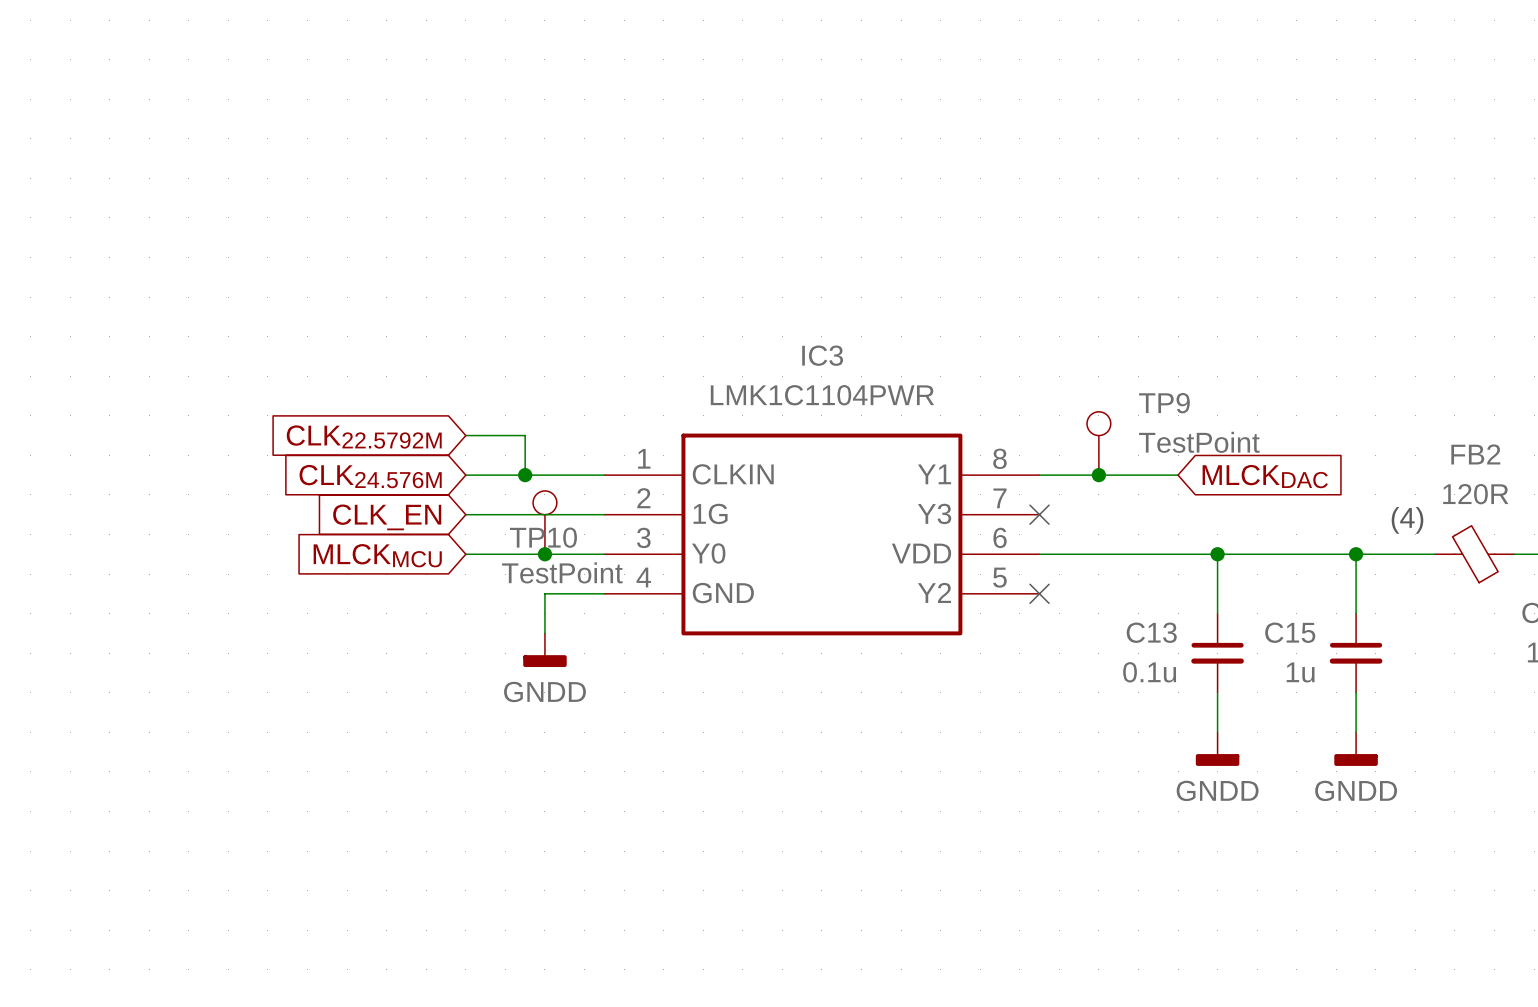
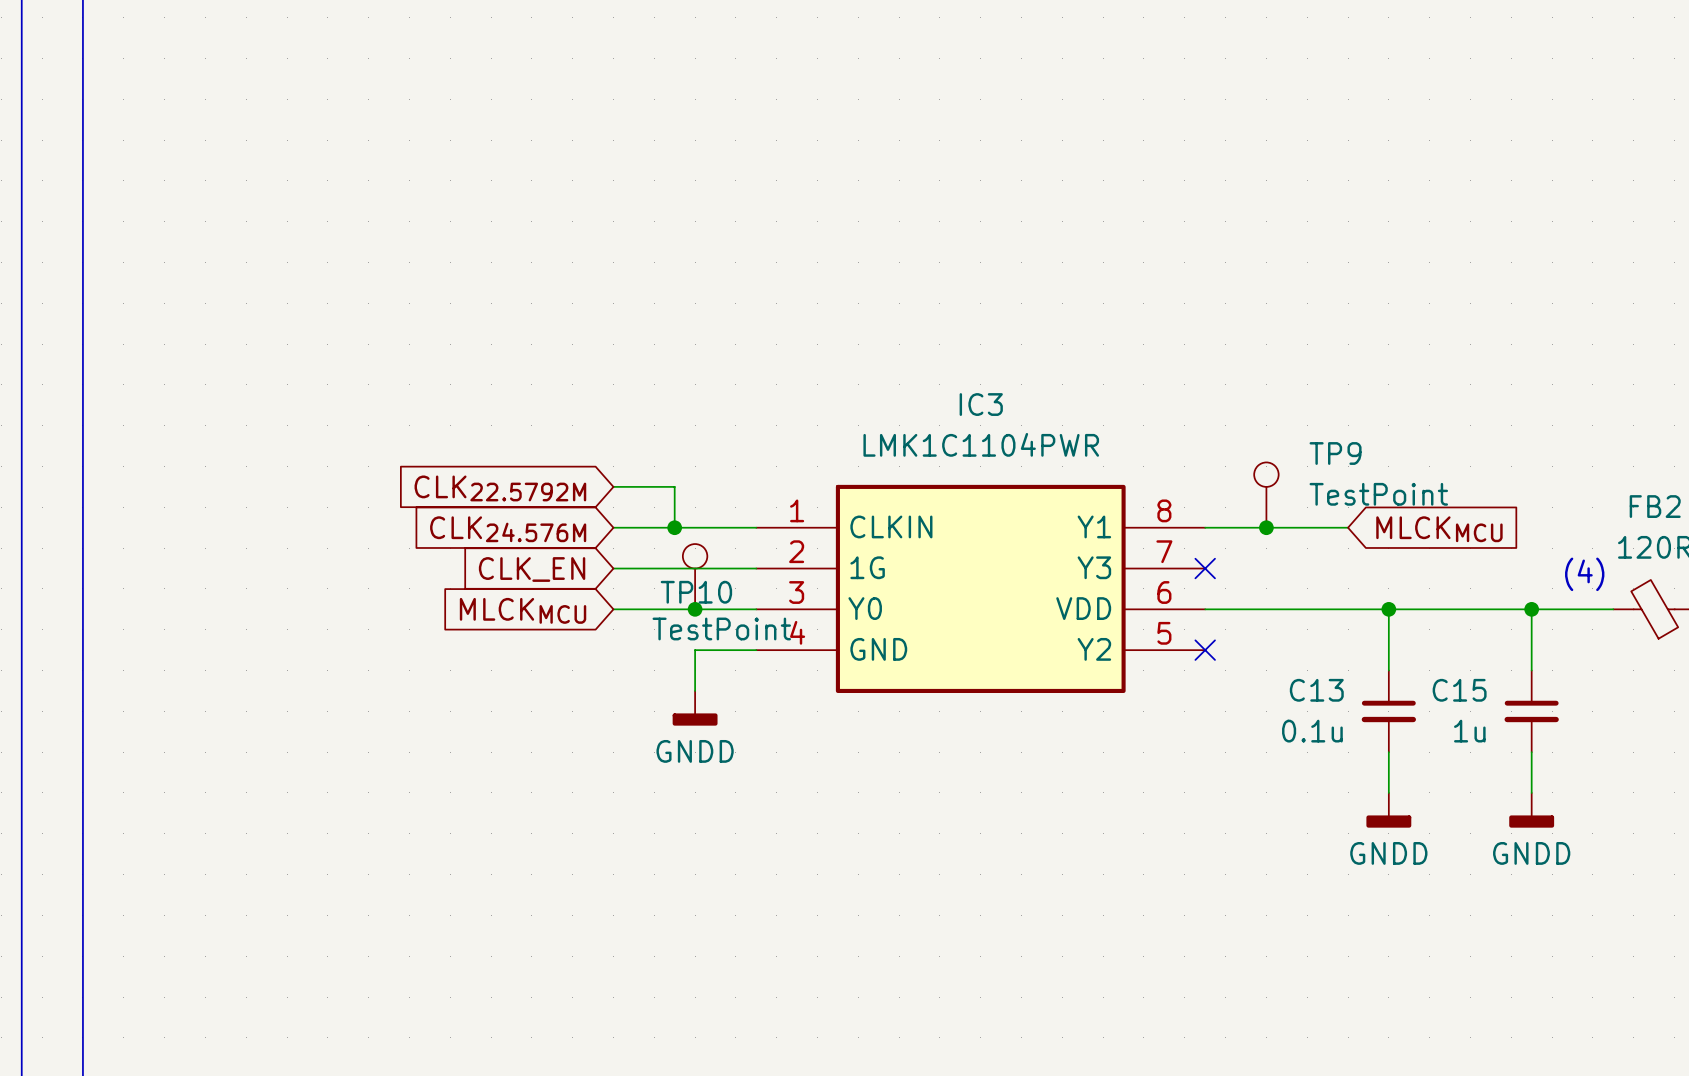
global label: MLCKDAC (1265, 476) -> MLCKMCU (1439, 529)

